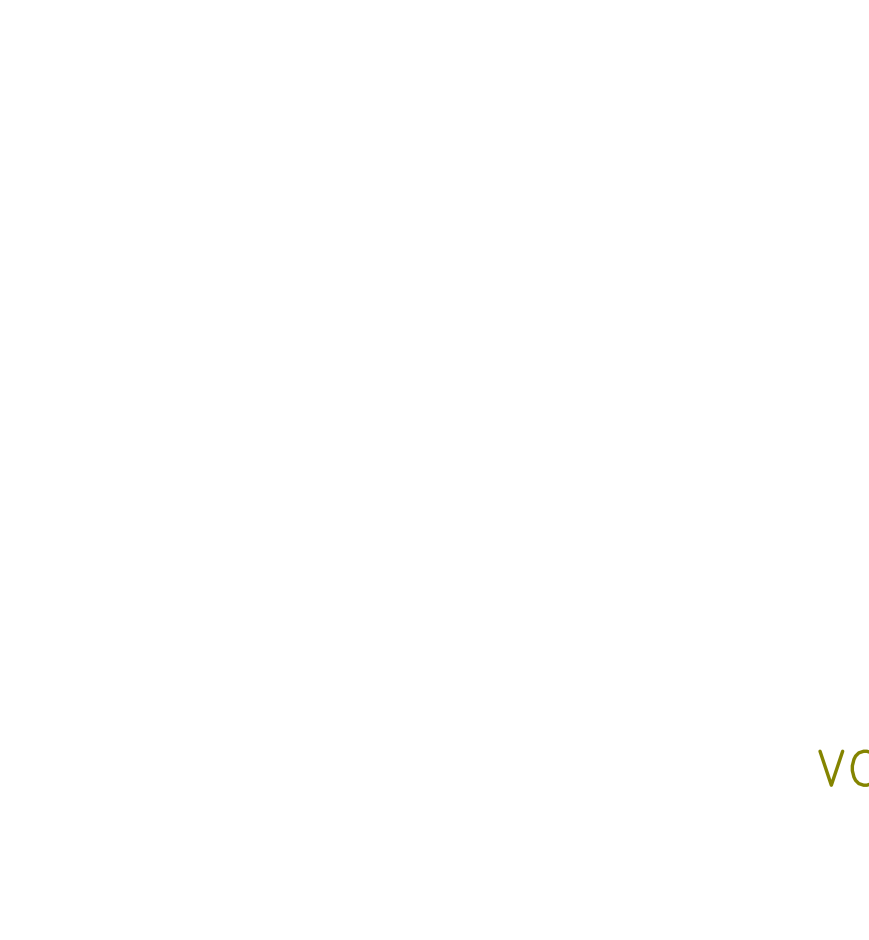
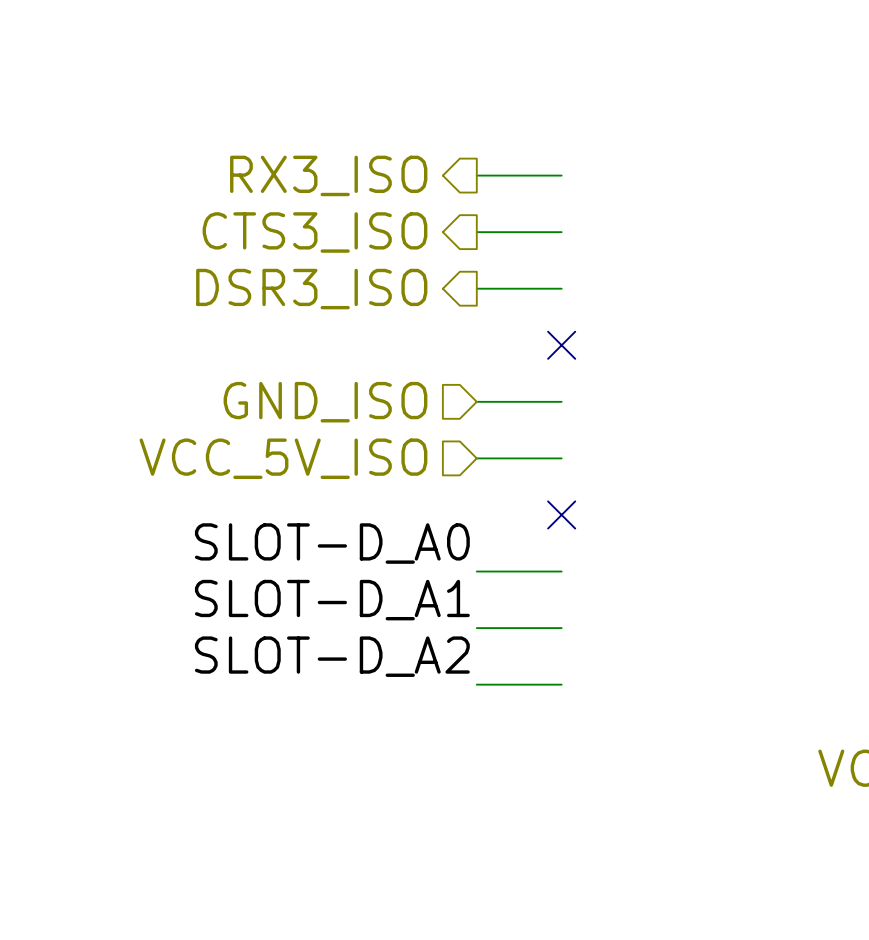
hierarchical label: none -> RX3_ISO (328, 175)
wire: none -> (476, 175) (561, 175)
hierarchical label: none -> CTS3_ISO (314, 232)
wire: none -> (476, 232) (561, 232)
wire: none -> (476, 288) (561, 288)
hierarchical label: none -> DSR3_ISO (311, 289)
no-connect mark: none -> (561, 345)
wire: none -> (476, 401) (561, 401)
hierarchical label: none -> GND_ISO (325, 402)
hierarchical label: none -> VCC_5V_ISO (283, 458)
wire: none -> (476, 458) (561, 458)
no-connect mark: none -> (561, 514)
label: none -> SLOT-D_A0 (332, 543)
wire: none -> (476, 571) (561, 571)
label: none -> SLOT-D_A1 (332, 600)
wire: none -> (476, 628) (561, 628)
label: none -> SLOT-D_A2 (332, 656)
wire: none -> (476, 684) (561, 684)

